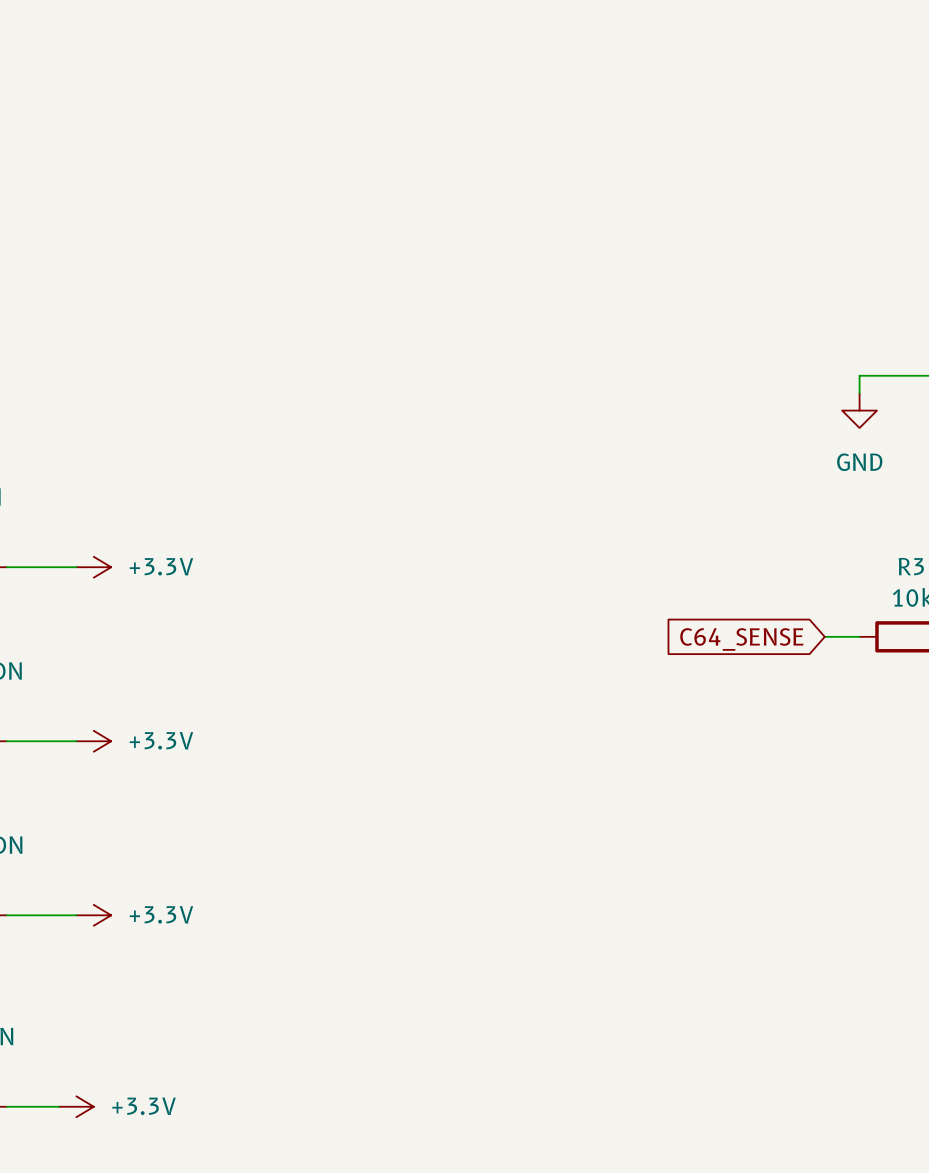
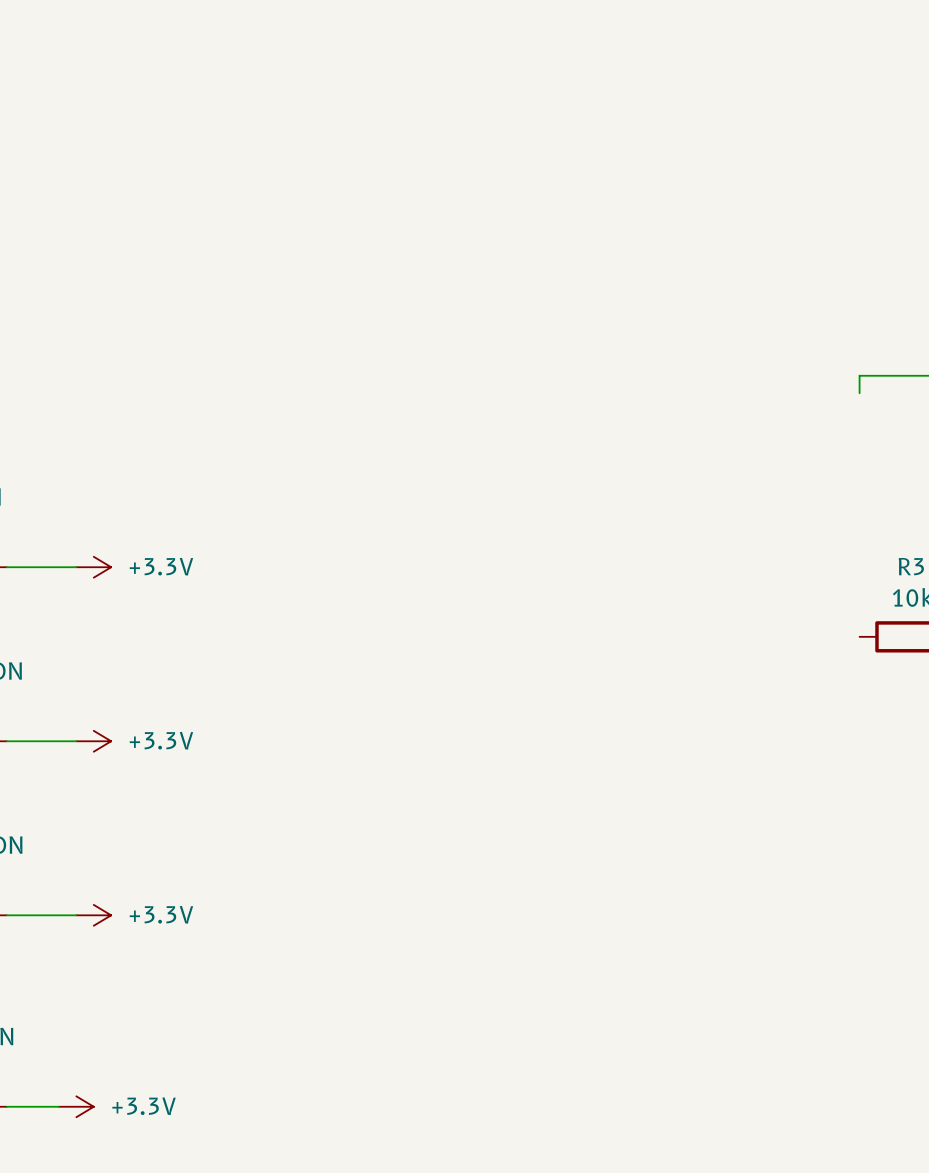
power symbol: GND (859, 410) -> none
wire: (824, 636) (859, 636) -> none
global label: C64_SENSE (741, 639) -> none

